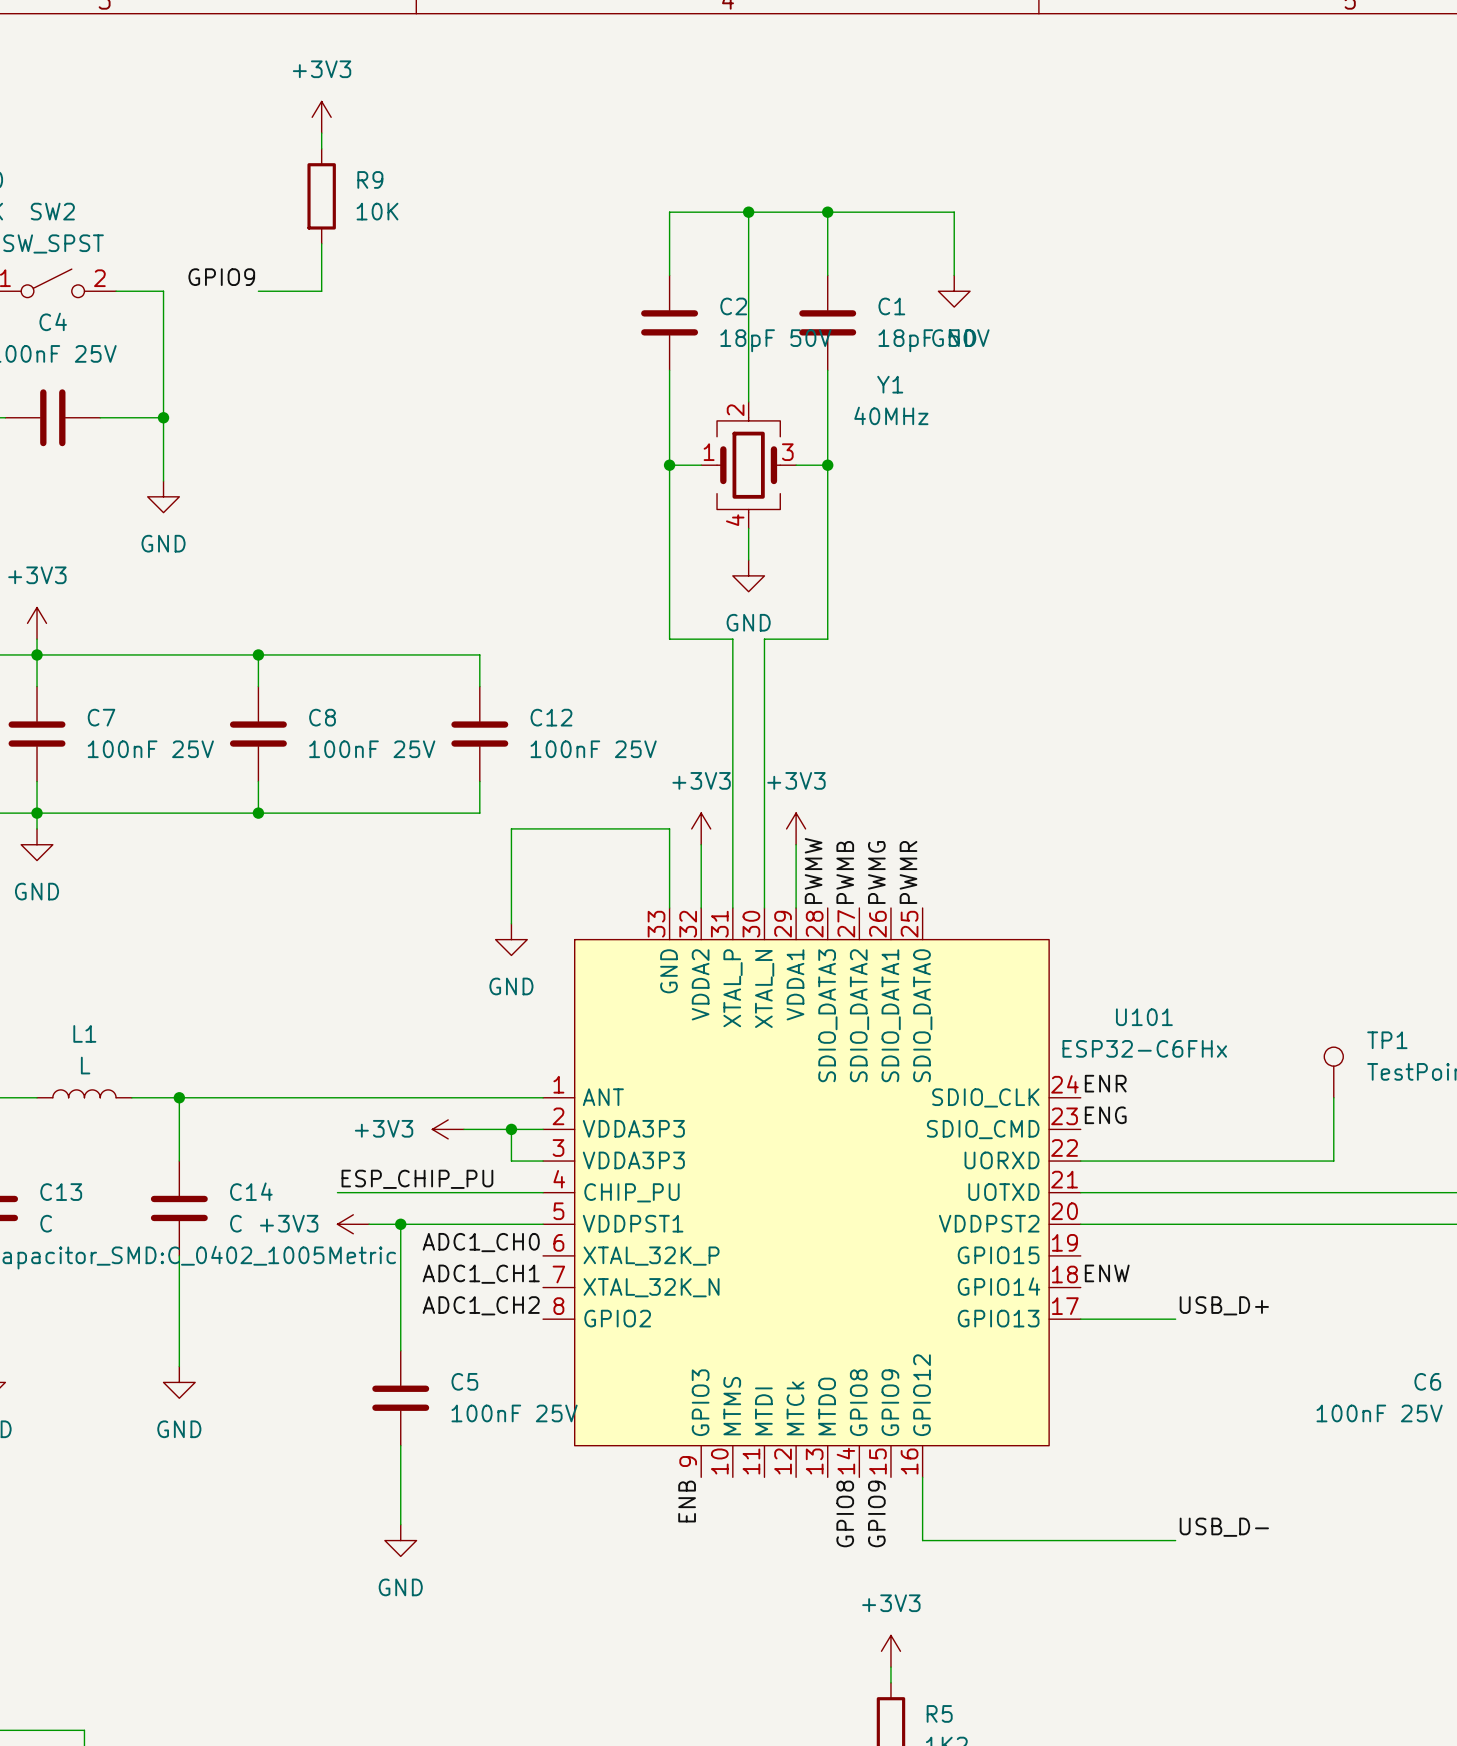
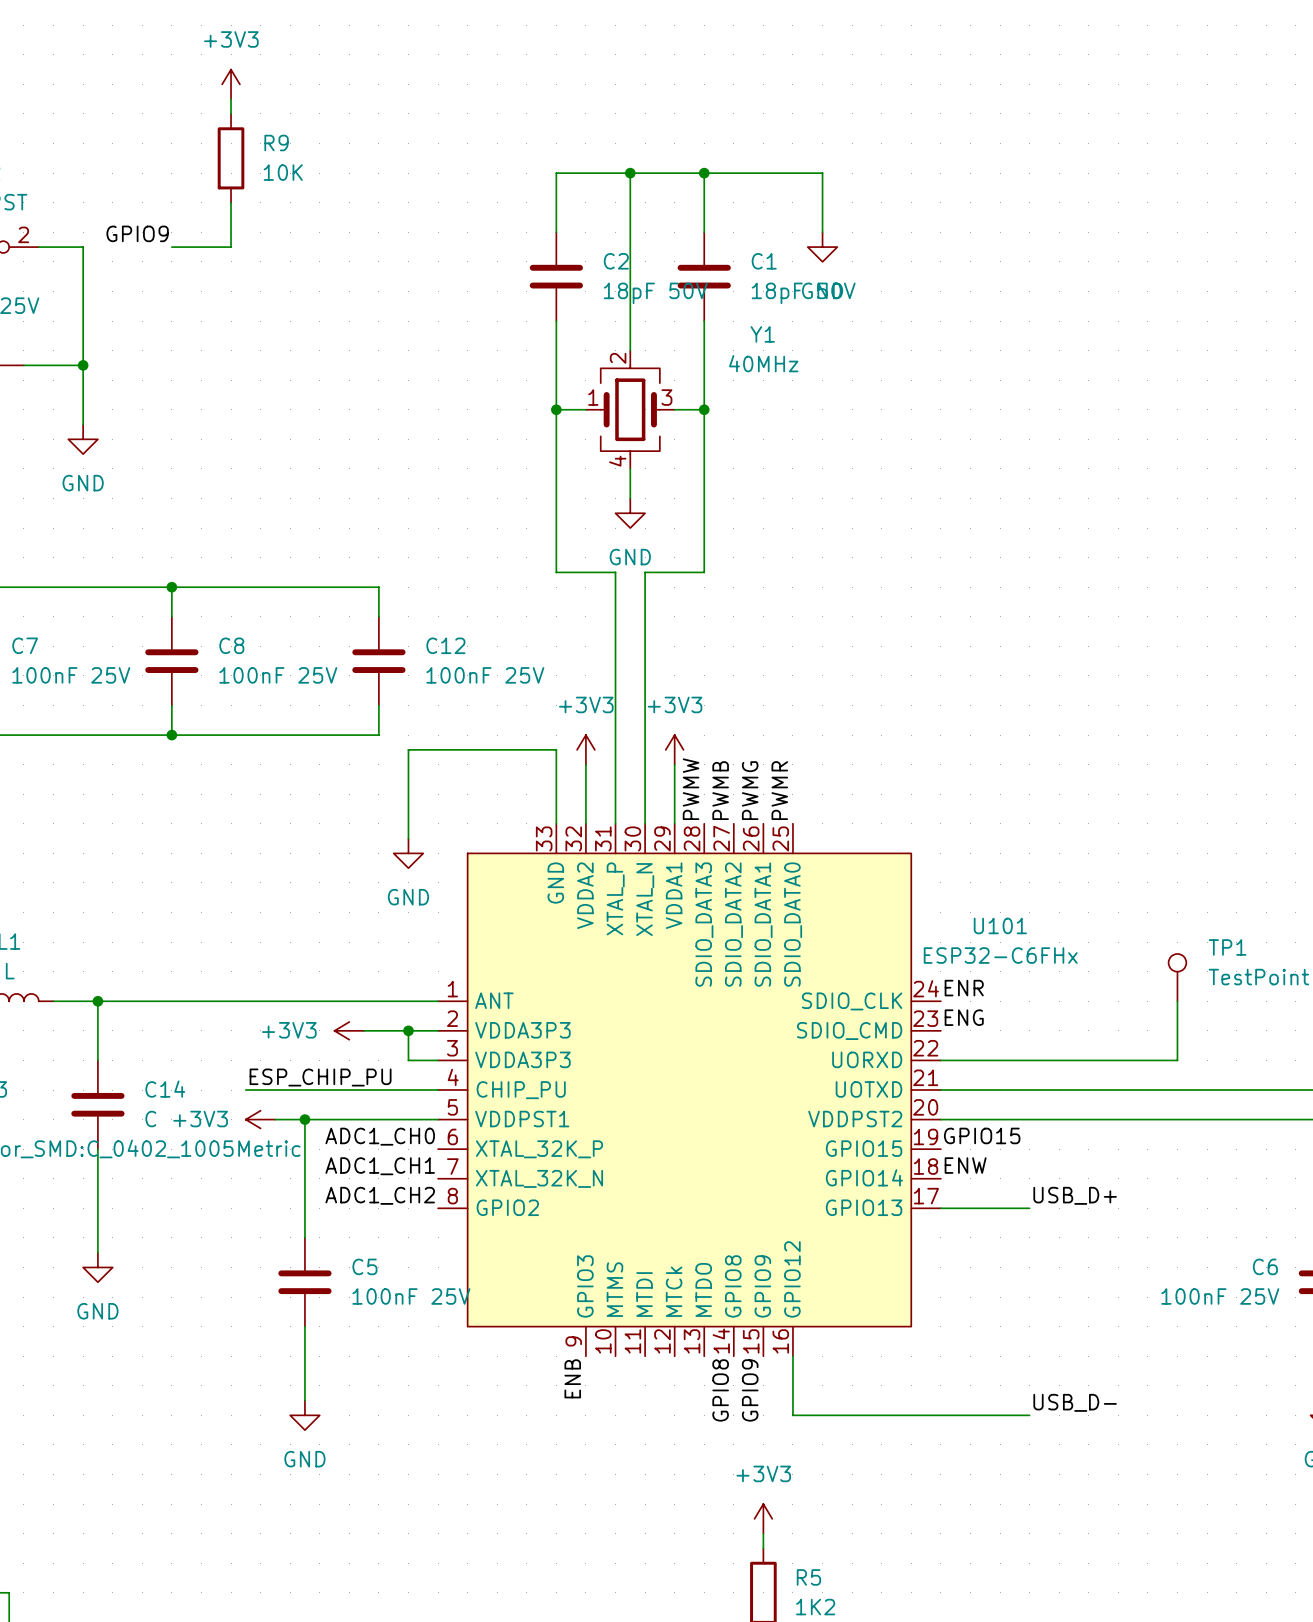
label: none -> GPIO15 (982, 1135)

